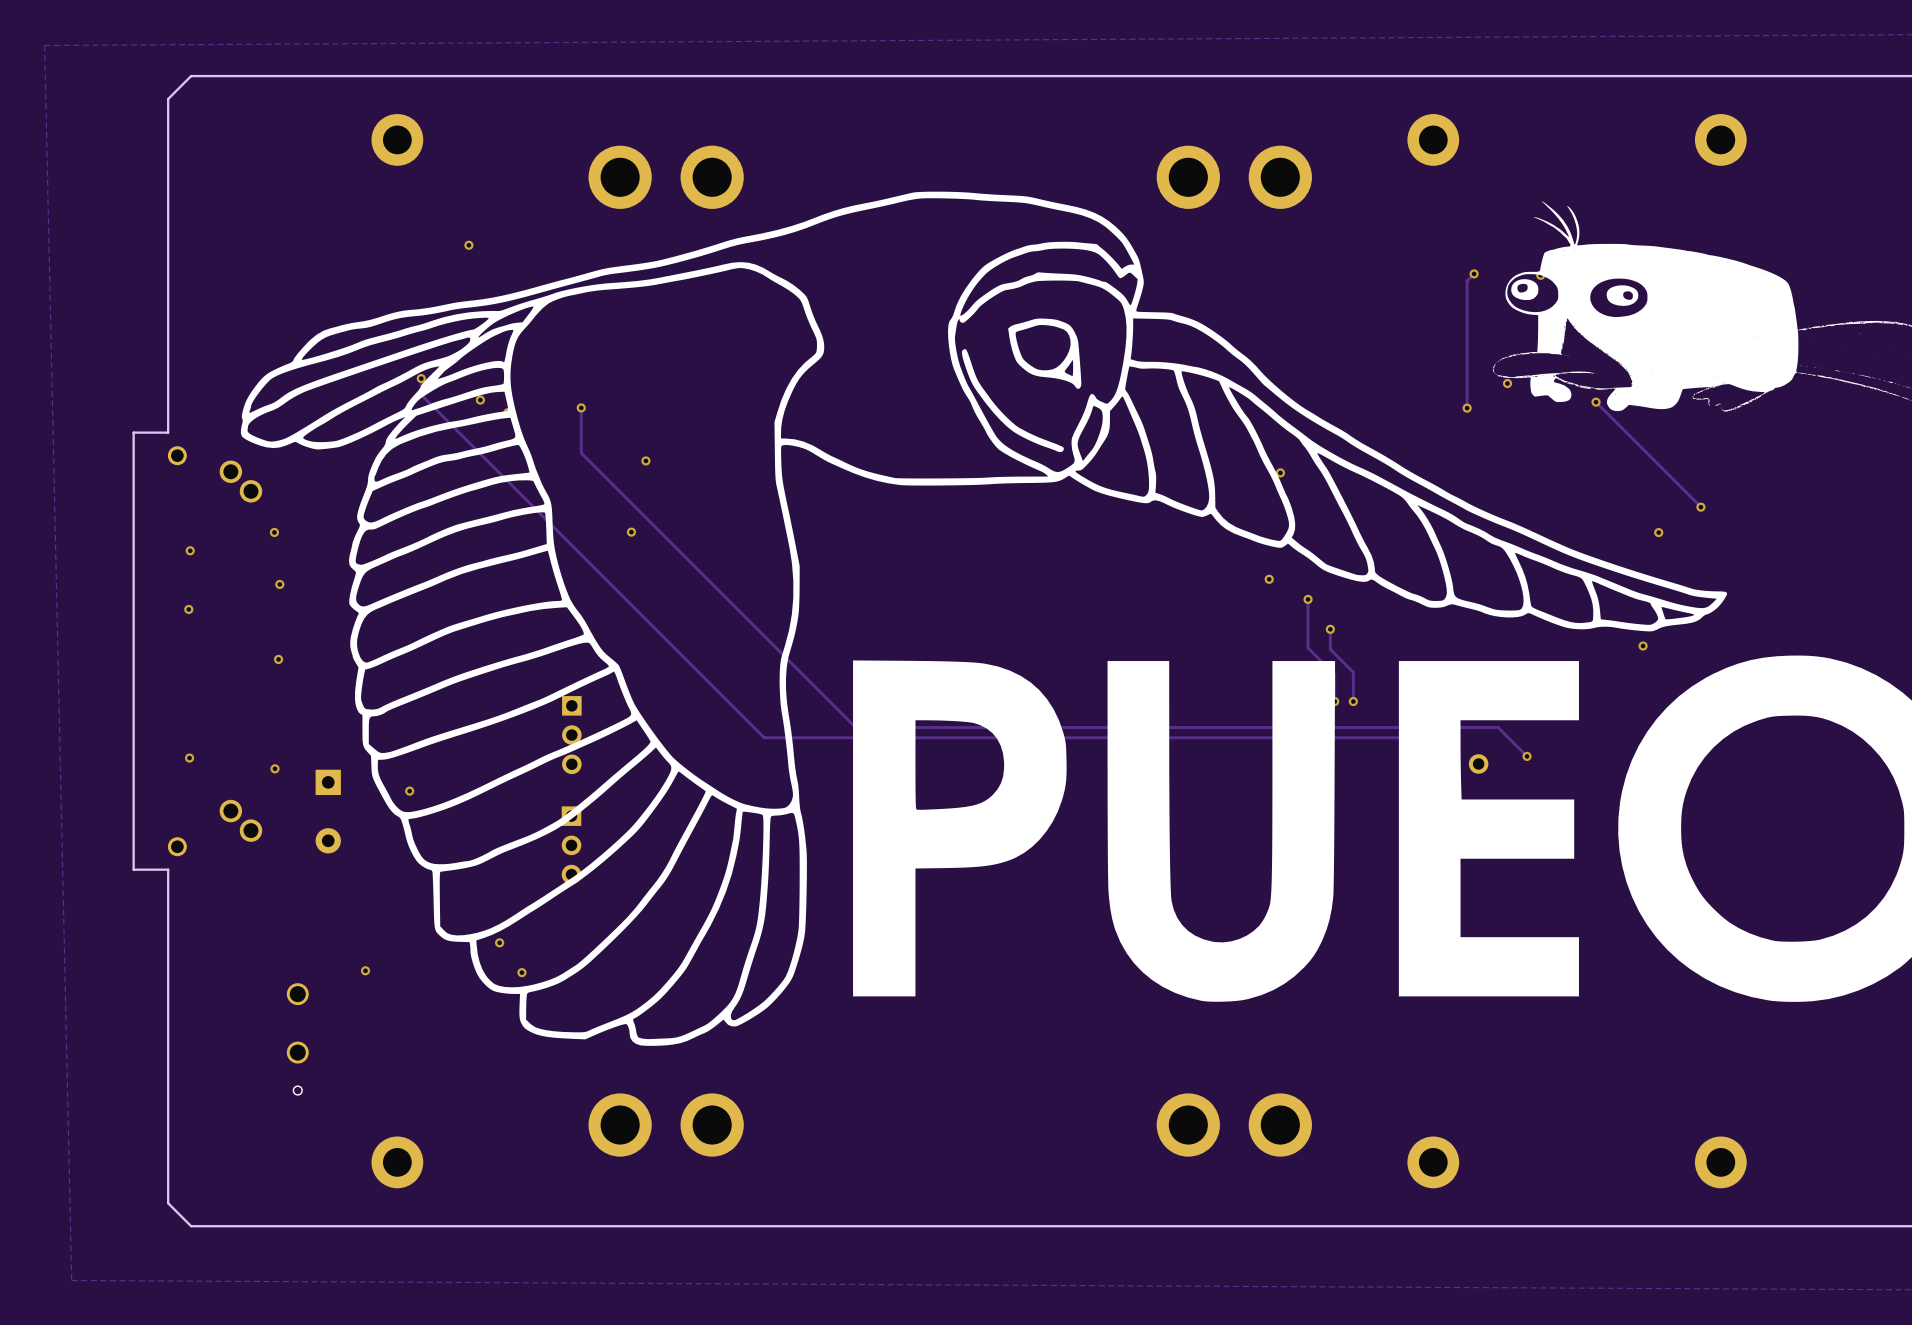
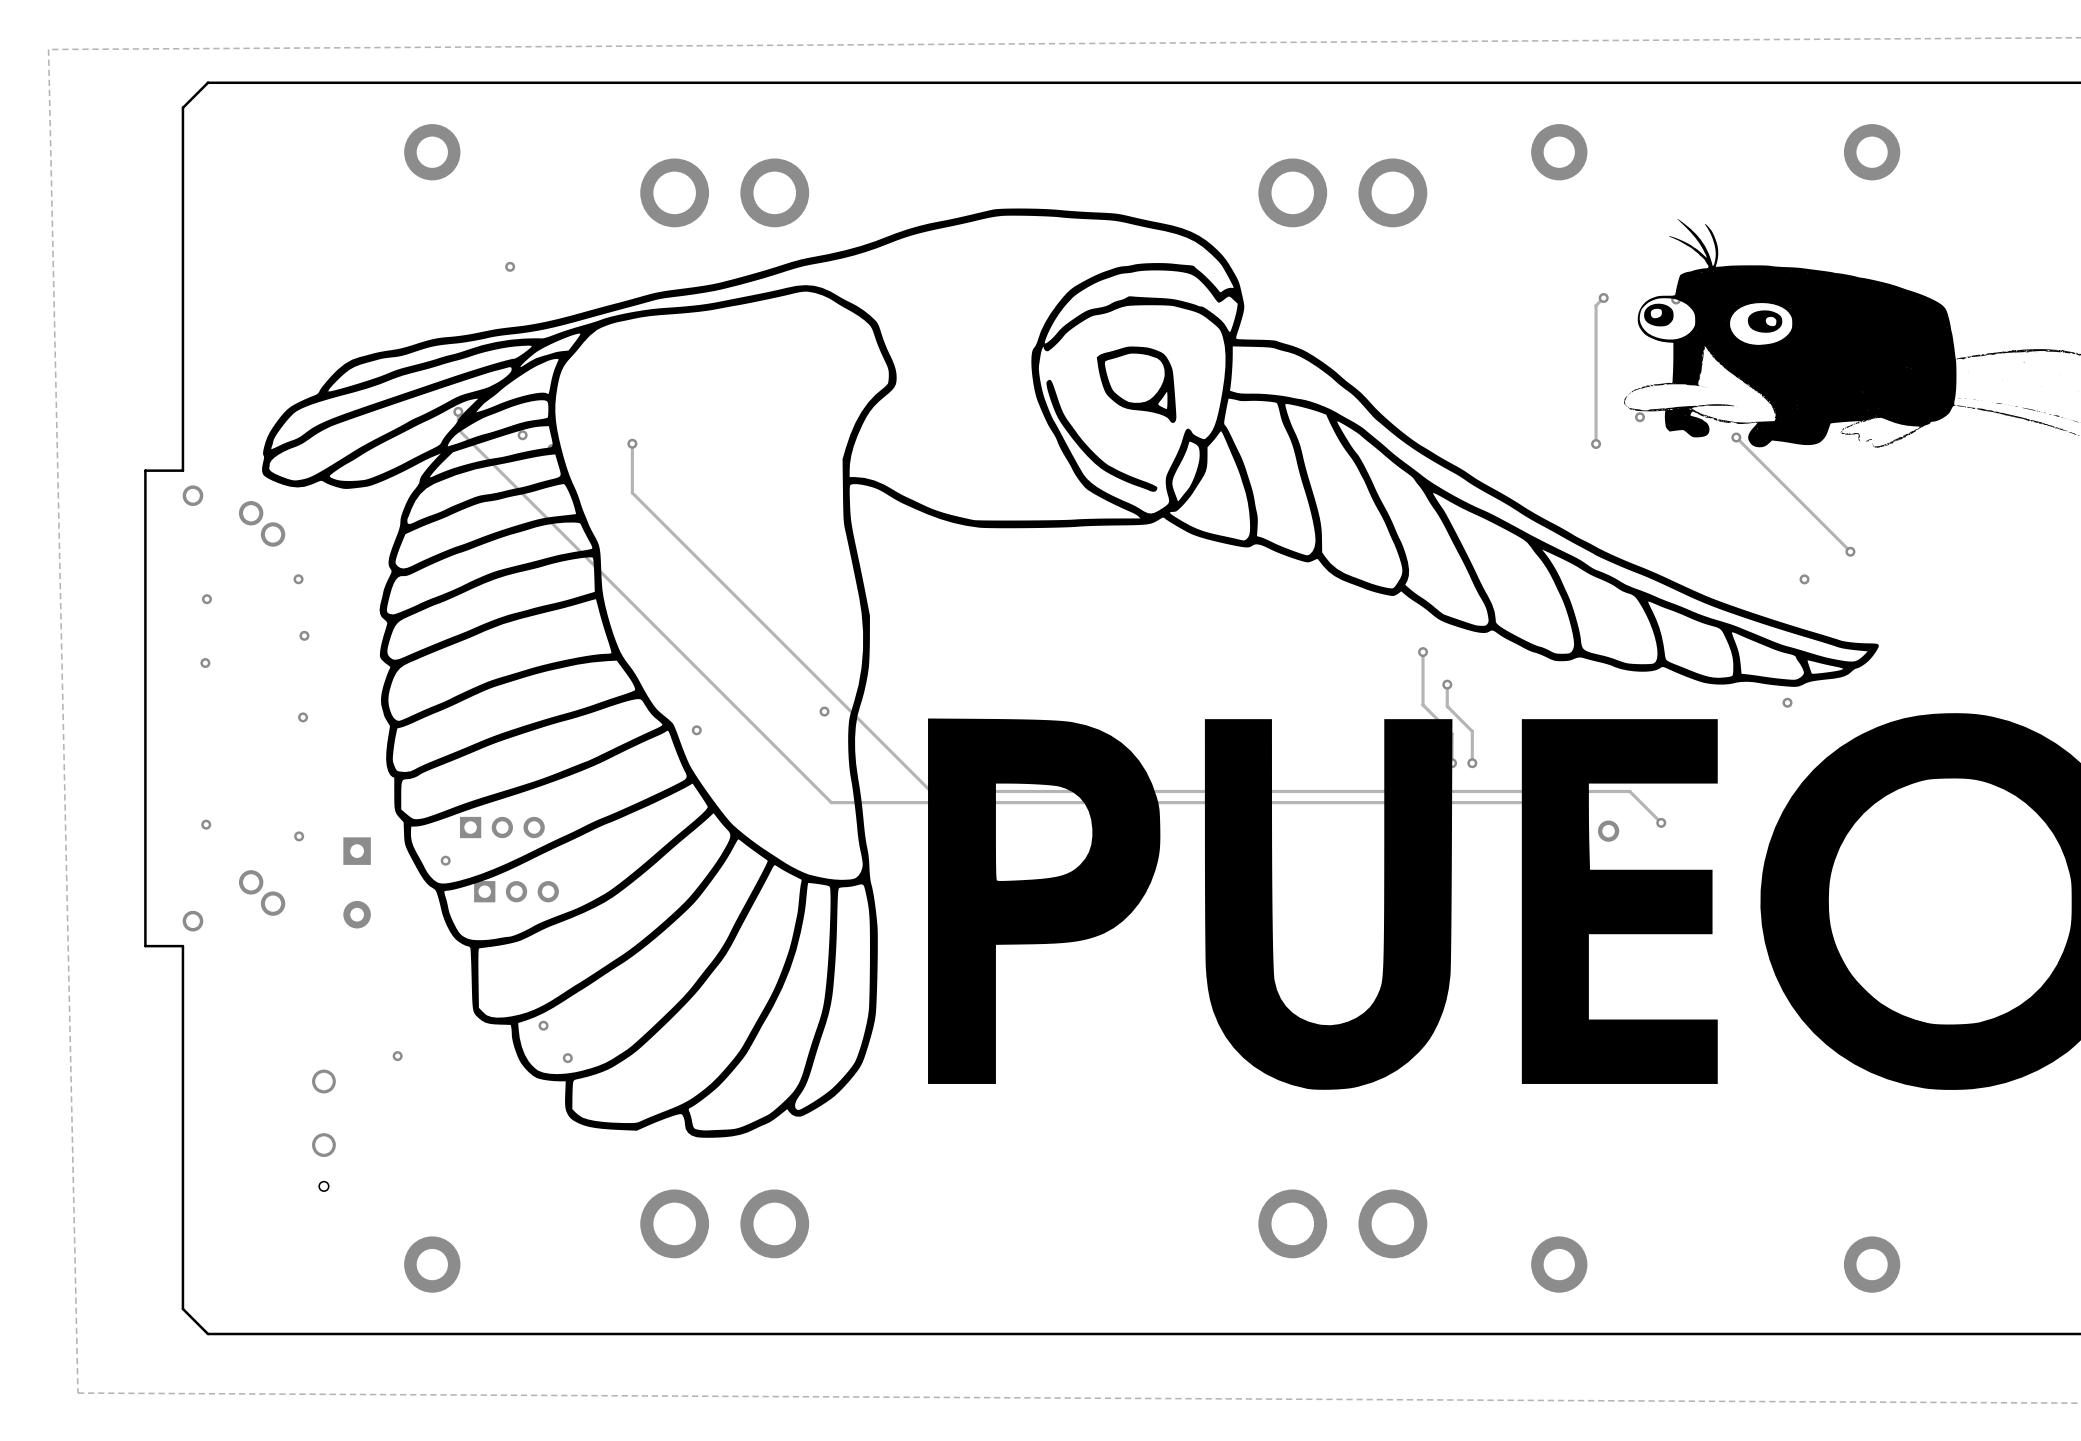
via: (645, 460) -> none
via: (1280, 472) -> none
via: (631, 532) -> none
via: (1269, 579) -> none
via: none -> (824, 711)
via: none -> (696, 730)
part: (571, 735) -> none
part: none -> (502, 827)
part: none -> (516, 891)
part: (571, 845) -> none

